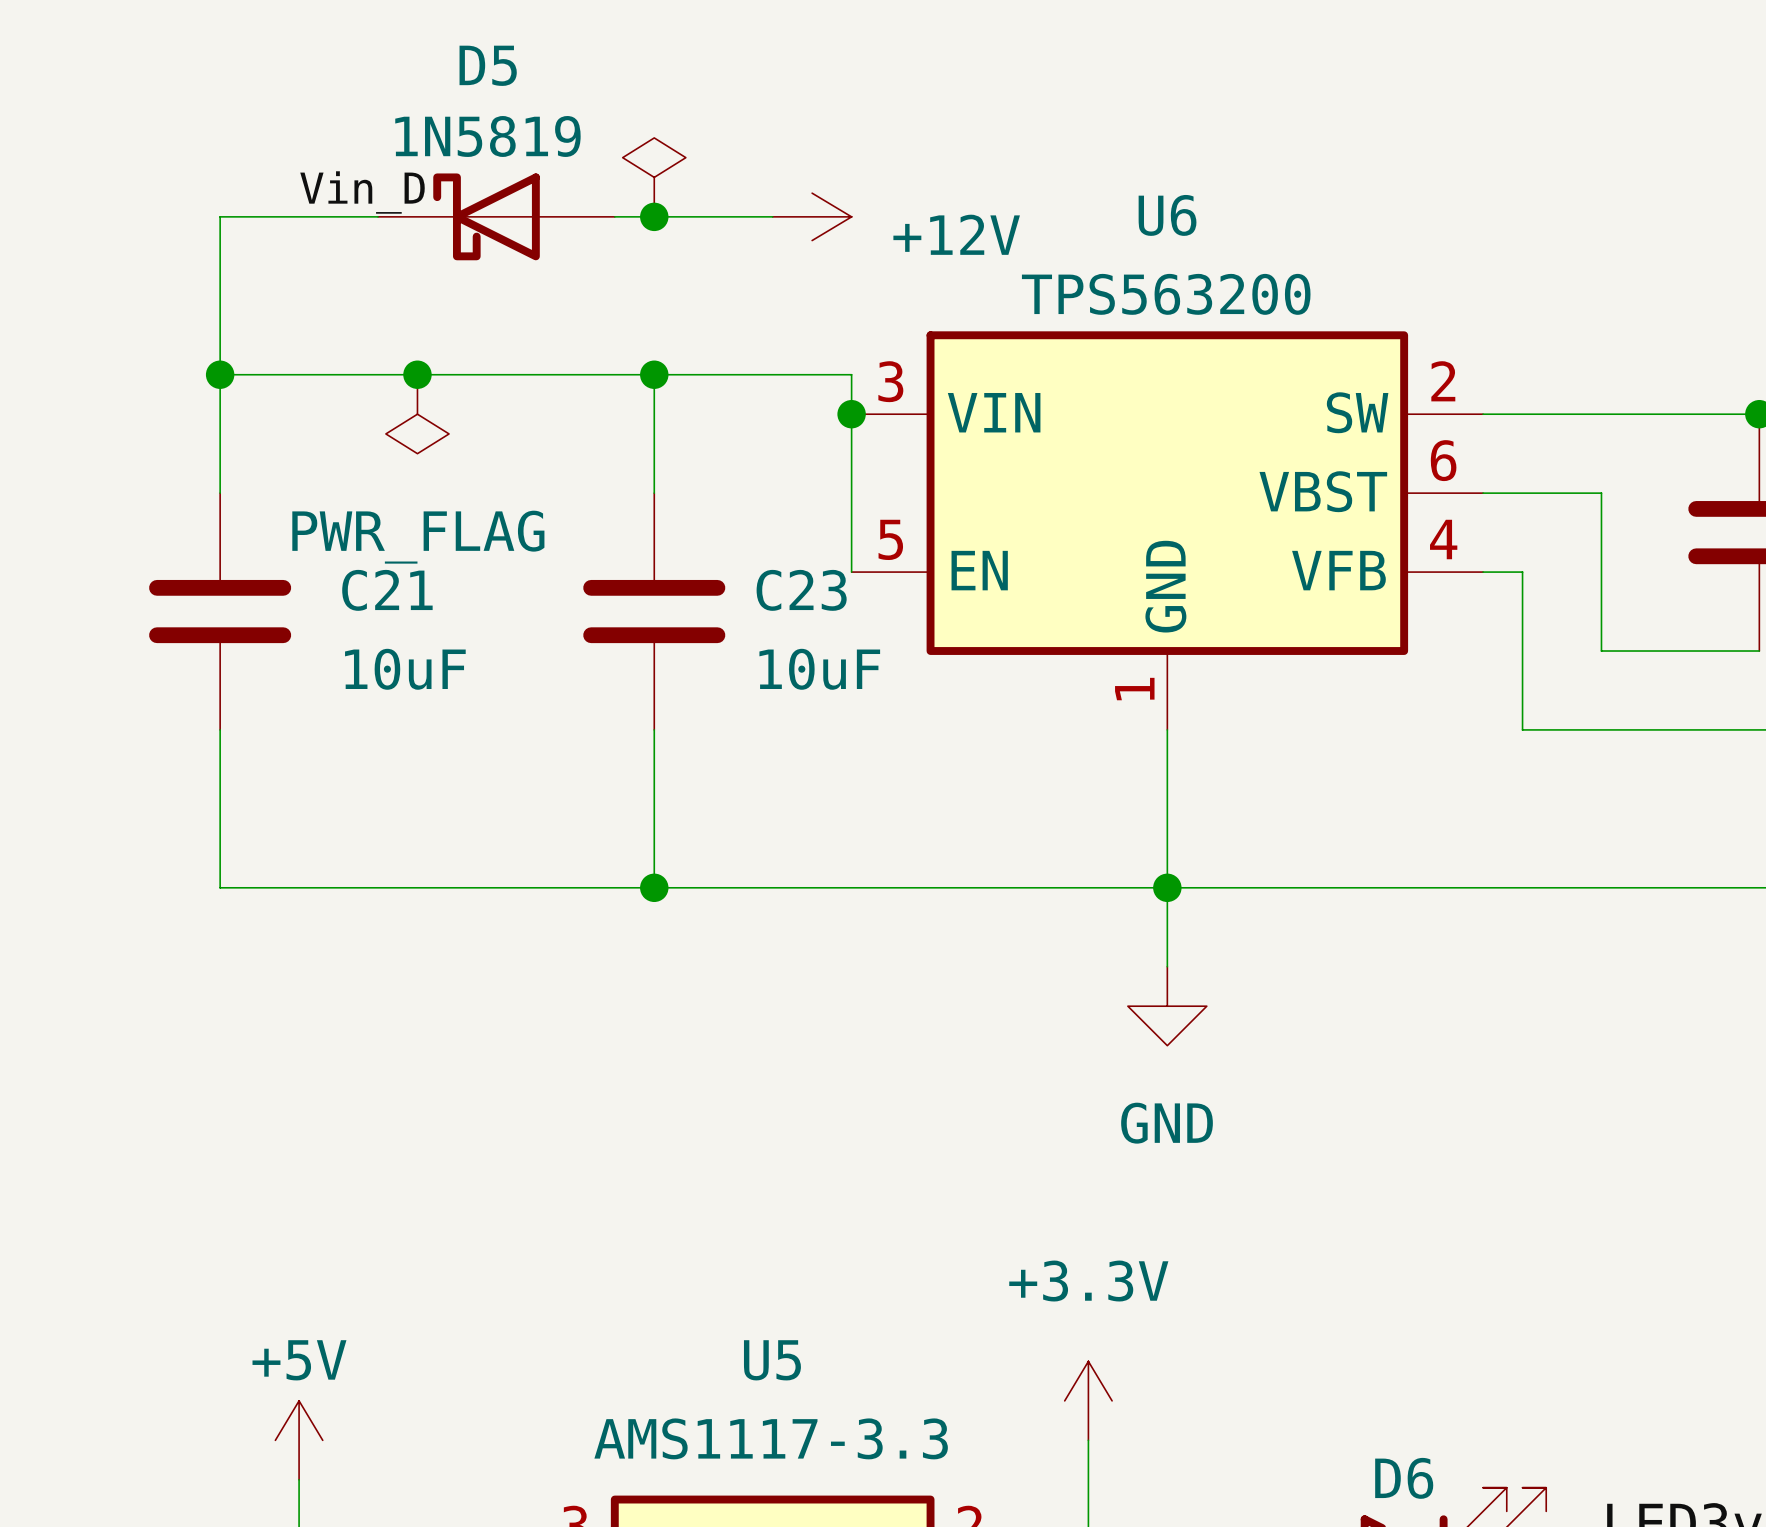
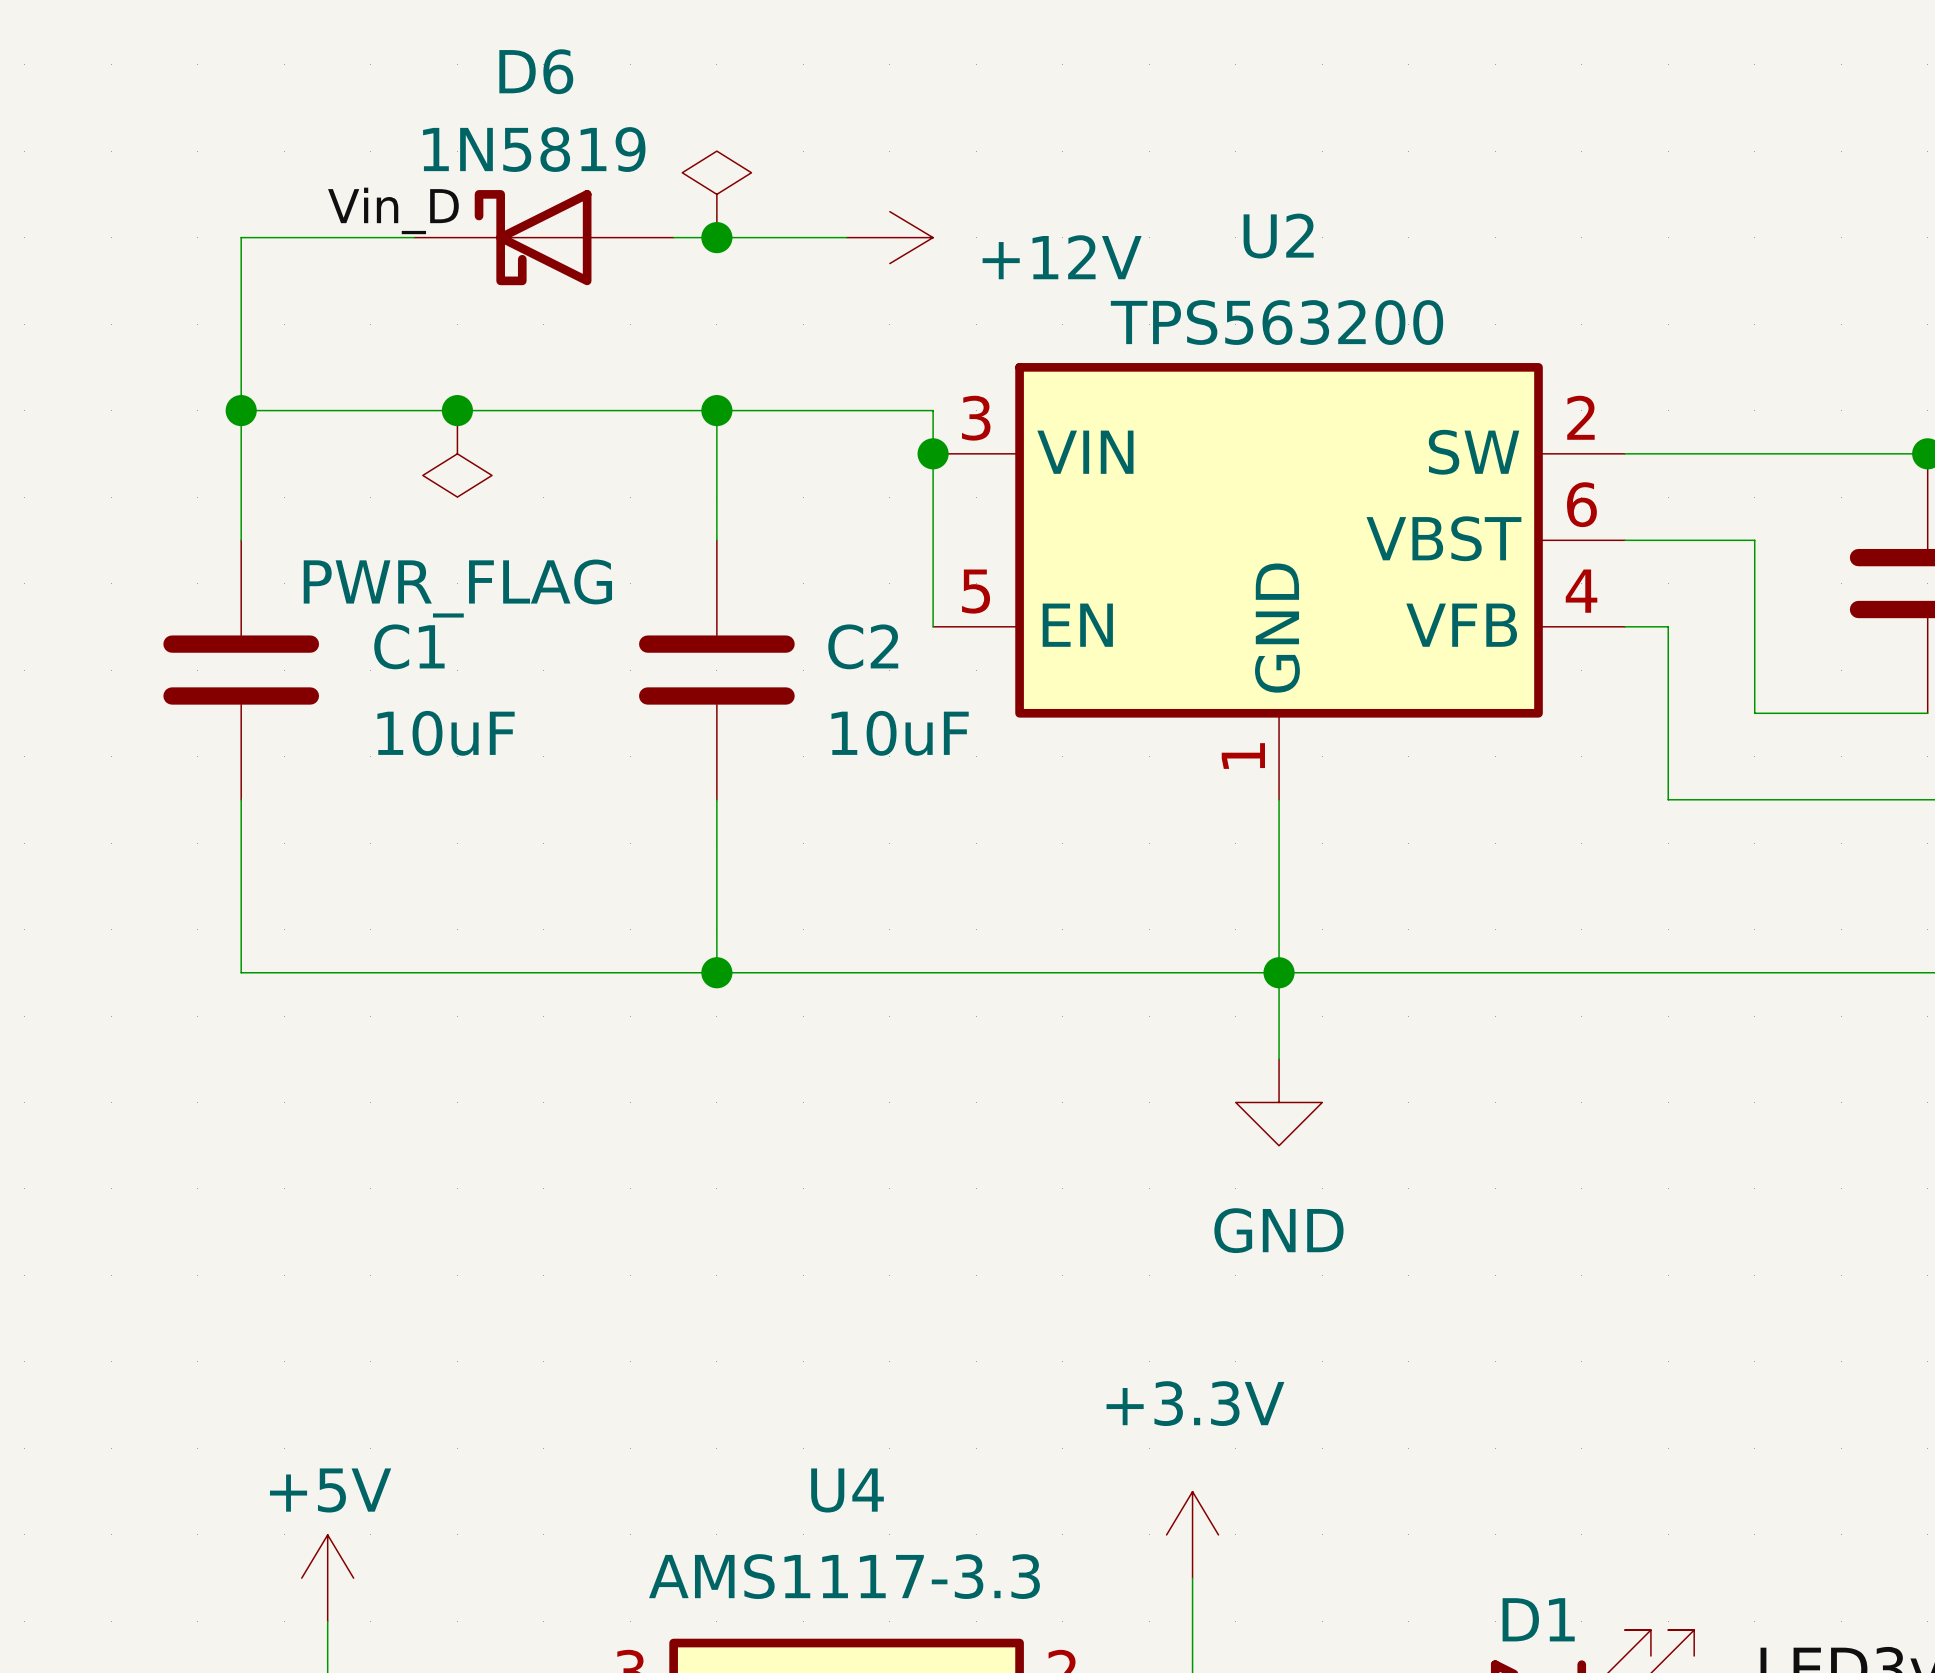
D5 name: D5 (488, 65) -> D6 (536, 71)
U6 name: U6 (1167, 215) -> U2 (1278, 236)
C21 name: C21 (387, 590) -> C1 (409, 646)
C23 name: C23 (801, 590) -> C2 (863, 646)
U5 name: U5 (772, 1360) -> U4 (847, 1490)
D6 name: D6 (1404, 1478) -> D1 (1538, 1619)

